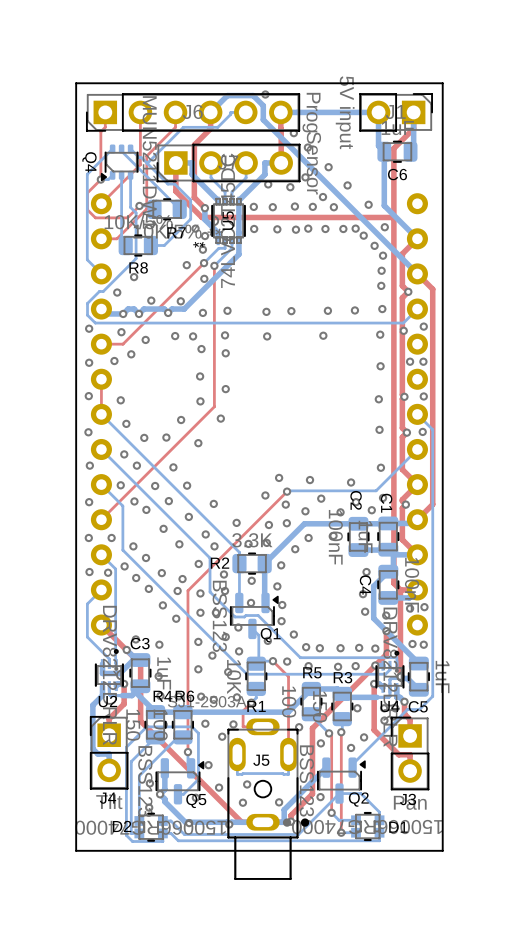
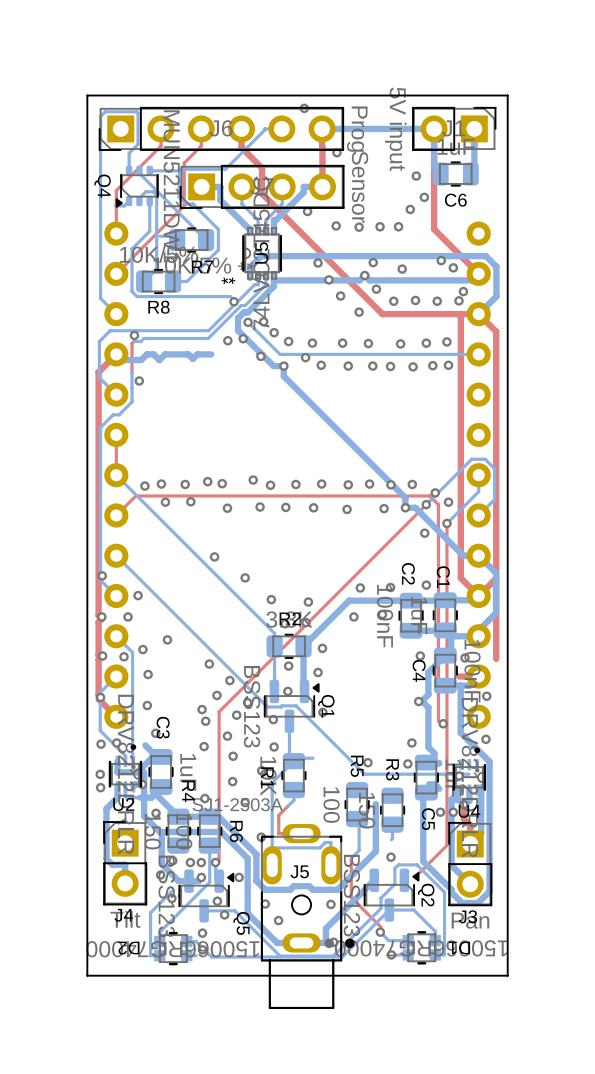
top track: (105, 112) (105, 127) (100, 131) (100, 179) (87, 192) (87, 209) (95, 217) (127, 217) (139, 205) -> none
bottom track: (210, 112) (227, 95) (253, 95) (263, 105) (263, 119) (417, 273) -> (250, 267) (261, 256) (485, 256) (496, 266) (496, 296) (478, 314)
bottom track: (230, 113) (217, 127) (183, 127) (147, 163) -> (264, 130) (225, 169) (180, 169) (179, 170)
top track: (140, 127) (140, 164) (101, 203) -> (161, 146) (116, 190) (116, 233)
top track: (210, 128) (194, 145) (194, 197) (204, 208) -> (241, 147) (262, 168) (262, 193) (382, 314) (478, 314)
top track: (413, 128) (393, 148) (393, 583) (400, 589) (400, 676) -> none
top track: (160, 142) (146, 156) (146, 208) (116, 238) (101, 238) -> (184, 163) (184, 206) (116, 273)
via: (307, 147) -> none
bottom track: (112, 149) (87, 174) (87, 260) -> (129, 170) (129, 153) (138, 144) (138, 112) (105, 111) (100, 116) (100, 298)
bottom track: (130, 149) (167, 184) (174, 184) (190, 200) (190, 219) (162, 245) -> (179, 170) (179, 197) (186, 204) (193, 204) (218, 229) (218, 250) (186, 281)
bottom track: none -> (179, 170) (149, 170)
bottom track: (384, 151) (384, 205) (417, 238) -> (273, 280) (359, 280) (364, 275) (369, 280) (472, 280) (478, 273)
via: none -> (416, 176)
top track: (175, 162) (175, 191) (201, 217) (393, 217) -> none
bottom track: (264, 167) (264, 174) (238, 200) (238, 241) -> (303, 192) (273, 220) (273, 229)
via: (328, 167) -> none
via: none -> (424, 197)
bottom track: (121, 175) (121, 241) (125, 245) -> (139, 200) (139, 198) (145, 191) (153, 191) (156, 195) (156, 268) (144, 281)
via: (305, 177) -> none
via: (100, 179) -> none
via: none -> (410, 209)
via: (347, 185) -> none
via: (290, 187) -> none
via: none -> (336, 225)
via: (322, 197) -> none
via: none -> (380, 226)
via: none -> (398, 226)
via: none -> (359, 227)
bottom track: (130, 201) (130, 207) (136, 212) (136, 258) (103, 291) (99, 291) (87, 303) (87, 315) (95, 323) (403, 323) (417, 309) -> (248, 322) (280, 354) (478, 354)
bottom track: none -> (149, 231) (132, 248) (132, 291) (137, 296) (230, 296)
via: (368, 204) -> none
via: (139, 205) -> none
via: (253, 206) -> none
via: (294, 206) -> none
via: (312, 206) -> none
via: (272, 207) -> none
via: (333, 207) -> none
bottom track: (204, 208) (204, 219) (218, 232) -> none
via: (204, 208) -> none
via: (195, 228) -> none
via: (254, 228) -> none
via: (308, 228) -> none
via: (343, 228) -> none
via: (355, 228) -> none
via: (295, 229) -> none
via: none -> (453, 267)
via: none -> (402, 269)
via: (363, 235) -> none
via: (205, 236) -> none
top track: (417, 238) (402, 253) (402, 285) (408, 291) (402, 297) (402, 394) (404, 396) (402, 398) (402, 428) (406, 432) (402, 437) (402, 469) (417, 484) (402, 499) (405, 504) (402, 508) (402, 539) (417, 554) -> (478, 273) (434, 229) (434, 128)
via: none -> (364, 275)
via: none -> (328, 279)
via: (374, 245) -> none
bottom track: (222, 248) (218, 248) (204, 263) -> (254, 284) (208, 330) (110, 330) (99, 341) (99, 377) (116, 394)
via: (202, 249) -> none
bottom track: (238, 249) (238, 254) (184, 309) -> (273, 286) (247, 312) (243, 312) (238, 318) (238, 330) (243, 335) (243, 338) (246, 338) (259, 354) (273, 366) (283, 366) (283, 376) (405, 497) (405, 507) (415, 507) (463, 555) (478, 555) (496, 573) (496, 613) (478, 630)
via: none -> (376, 289)
via: none -> (463, 291)
via: (383, 255) -> none
via: none -> (340, 296)
via: none -> (415, 300)
via: none -> (393, 301)
via: none -> (437, 301)
via: none -> (458, 300)
top track: (204, 263) (123, 344) (101, 344) -> none
via: (186, 265) -> none
top track: (214, 265) (214, 406) (101, 519) -> none
bottom track: none -> (245, 304) (241, 305) (208, 338) (143, 338) (140, 341) (134, 341)
via: (214, 265) -> none
via: (381, 270) -> none
via: none -> (359, 312)
top track: none -> (460, 314) (460, 578) (478, 596)
via: (134, 277) -> none
via: (204, 278) -> none
via: none -> (263, 321)
via: none -> (248, 322)
via: (381, 285) -> none
via: none -> (274, 332)
via: (408, 291) -> none
via: none -> (243, 338)
top track: none -> (134, 341) (132, 343) (132, 372)
via: none -> (227, 340)
via: none -> (288, 341)
via: none -> (446, 341)
via: none -> (312, 343)
via: none -> (342, 343)
via: none -> (368, 343)
via: none -> (400, 343)
via: none -> (426, 343)
via: (151, 300) -> none
via: (180, 301) -> none
via: (382, 309) -> none
via: (327, 310) -> none
via: (354, 310) -> none
via: (291, 311) -> none
via: (168, 312) -> none
via: (202, 312) -> none
via: (123, 313) -> none
via: (139, 313) -> none
via: none -> (321, 365)
via: none -> (432, 365)
via: none -> (448, 365)
via: none -> (283, 366)
via: none -> (348, 366)
via: none -> (372, 366)
via: none -> (390, 366)
via: none -> (413, 366)
bottom track: none -> (132, 372) (132, 401) (119, 414) (113, 414) (100, 427) (100, 580) (116, 596)
via: (423, 326) -> none
via: (89, 328) -> none
via: (403, 330) -> none
via: (380, 334) -> none
via: (225, 335) -> none
via: (323, 335) -> none
via: (175, 336) -> none
via: (193, 336) -> none
via: (267, 336) -> none
via: (145, 339) -> none
via: (201, 349) -> none
via: (225, 353) -> none
via: (131, 354) -> none
via: (114, 361) -> none
via: (410, 361) -> none
via: (423, 361) -> none
via: (89, 362) -> none
via: (380, 366) -> none
via: (200, 376) -> none
via: (225, 389) -> none
via: (88, 396) -> none
via: (404, 396) -> none
via: (423, 396) -> none
via: (378, 399) -> none
via: (120, 400) -> none
via: (200, 401) -> none
bottom track: (417, 414) (432, 429) (432, 696) (419, 709) (407, 709) (352, 764) (352, 767) -> (478, 475) (478, 491) (446, 523)
via: none -> (222, 483)
via: none -> (161, 484)
via: none -> (185, 484)
via: none -> (295, 484)
via: none -> (321, 484)
via: none -> (348, 484)
via: none -> (369, 484)
via: none -> (390, 484)
via: none -> (412, 484)
via: none -> (270, 485)
via: (422, 431) -> none
via: (88, 432) -> none
via: (406, 432) -> none
via: none -> (448, 502)
top track: none -> (426, 504) (219, 711) (219, 861)
via: none -> (426, 504)
via: none -> (260, 507)
via: none -> (285, 507)
via: none -> (313, 507)
via: none -> (405, 507)
via: none -> (384, 508)
via: none -> (347, 509)
top track: none -> (116, 515) (135, 495) (429, 495) (438, 504) (438, 721)
bottom track: (101, 449) (210, 558) (210, 592) (234, 616) (244, 616) -> (140, 580) (267, 706) (280, 706)
bottom track: (417, 449) (376, 490) (287, 491) -> (478, 515) (494, 499) (494, 468) (485, 459) (471, 459) (426, 504)
via: (124, 454) -> none
top track: none -> (446, 523) (446, 845) (416, 876)
via: none -> (446, 523)
via: none -> (424, 533)
via: (89, 465) -> none
via: (136, 465) -> none
via: (173, 467) -> none
via: (380, 467) -> none
via: (279, 477) -> none
via: (310, 480) -> none
via: (351, 482) -> none
via: (120, 485) -> none
via: (155, 486) -> none
top track: (287, 491) (187, 590) (187, 752) -> none
via: (287, 491) -> none
via: (265, 495) -> none
via: (383, 497) -> none
via: (321, 498) -> none
via: (134, 501) -> none
via: (168, 501) -> none
via: (356, 502) -> none
via: (285, 504) -> none
via: (405, 504) -> none
bottom track: (122, 506) (122, 550) (246, 674) (385, 674) (389, 669) (389, 665) -> none
via: (146, 509) -> none
via: (305, 511) -> none
via: none -> (360, 587)
via: (188, 516) -> none
via: none -> (138, 595)
via: (286, 523) -> none
via: (163, 528) -> none
via: (205, 534) -> none
via: (179, 544) -> none
via: (133, 546) -> none
via: (214, 546) -> none
via: (295, 549) -> none
via: (198, 563) -> none
R2 name position: R2 (220, 563) -> R2 (290, 618)
via: (161, 573) -> none
via: none -> (465, 658)
via: (223, 574) -> none
via: (136, 578) -> none
bottom track: (373, 586) (373, 618) (418, 663) -> (428, 672) (428, 694) (421, 701) (428, 707) (428, 747) (435, 753)
via: none -> (148, 674)
via: (148, 588) -> none
via: (177, 590) -> none
via: (225, 590) -> none
via: (363, 594) -> none
bottom track: none -> (460, 685) (460, 732) (489, 761) (489, 891) (478, 902) (462, 902) (423, 861) (423, 795) (426, 792)
via: (162, 605) -> none
via: (282, 605) -> none
via: none -> (216, 695)
via: none -> (100, 697)
via: (410, 608) -> none
via: (200, 612) -> none
via: none -> (147, 705)
via: (386, 615) -> none
via: none -> (236, 715)
top track: (101, 625) (140, 664) (140, 721) (241, 822) (291, 821) (291, 815) (312, 793) (312, 728) (386, 654) (386, 631) -> (116, 716) (98, 699) (100, 697) (98, 695) (98, 659) (100, 657) (98, 655) (98, 622) (101, 618) (98, 615) (98, 372) (116, 354)
via: none -> (205, 721)
bottom track: (252, 628) (258, 635) (258, 661) (256, 663) -> (289, 721) (289, 756) (293, 761) (272, 782) (272, 865)
via: (293, 634) -> none
Q1 name rotation: 0° (270, 635) -> 90° clockwise (326, 706)
via: (225, 636) -> none
via: (267, 640) -> none
C3 name rotation: 0° (140, 643) -> 90° clockwise (163, 727)
via: (159, 644) -> none
via: (412, 644) -> none
via: none -> (116, 742)
via: (306, 647) -> none
via: none -> (101, 744)
via: (319, 648) -> none
via: (340, 648) -> none
via: (375, 648) -> none
via: (126, 649) -> none
via: none -> (204, 746)
via: (212, 655) -> none
bottom track: (300, 657) (396, 657) (396, 665) -> (344, 754) (364, 774) (469, 774)
via: none -> (233, 756)
top track: (272, 661) (288, 676) (288, 754) -> none
via: (272, 661) -> none
via: (287, 661) -> none
via: none -> (367, 762)
via: (375, 665) -> none
via: (308, 666) -> none
via: (338, 666) -> none
via: (198, 669) -> none
U4 position: (389, 671) -> (469, 771)
R5 name rotation: 0° (312, 672) -> 90° clockwise (357, 766)
via: none -> (100, 774)
via: (158, 676) -> none
C5 position: (418, 676) -> (426, 777)
R3 name rotation: 0° (342, 677) -> 90° clockwise (392, 769)
via: none -> (232, 781)
top track: (124, 683) (124, 703) (109, 718) (109, 735) -> none
top track: (374, 683) (374, 730) (398, 754) (410, 754) (410, 771) -> none
via: (374, 683) -> none
via: none -> (100, 787)
bottom track: none -> (481, 787) (481, 833) (470, 843)
bottom track: none -> (460, 790) (451, 799) (451, 865) (470, 884)
bottom track: none -> (469, 790) (469, 800) (465, 803)
bottom track: (418, 689) (407, 678) (391, 678) (388, 697) (345, 697) (337, 688) (311, 688) (288, 712) (190, 712) -> (375, 804) (375, 851) (337, 889) (312, 889) (309, 886) (293, 886) (290, 889) (265, 889) (256, 880) (256, 854) (218, 816)
via: (160, 695) -> none
R4 name rotation: 0° (162, 696) -> 90° clockwise (188, 791)
R6 name rotation: 0° (184, 696) -> 90° clockwise (236, 831)
R6 name position: R6 (184, 696) -> R6 (236, 831)
via: (201, 696) -> none
via: (236, 697) -> none
via: (251, 702) -> none
R1 name rotation: 0° (256, 706) -> 90° clockwise (267, 777)
R1 name position: R1 (256, 706) -> R1 (267, 777)
C5 name rotation: 0° (418, 706) -> 90° clockwise (428, 819)
via: (357, 708) -> none
via: none -> (156, 813)
bottom track: (311, 714) (329, 733) -> none
bottom track: none -> (359, 824) (359, 850) (351, 858)
via: (384, 720) -> none
via: (205, 723) -> none
via: (233, 724) -> none
bottom track: none -> (161, 832) (161, 864) (178, 881) (198, 881) (201, 877)
via: (299, 727) -> none
via: none -> (261, 837)
top track: (341, 732) (341, 832) -> none
via: (341, 732) -> none
top track: (329, 733) (331, 735) (331, 812) -> none
via: (329, 733) -> none
via: (222, 736) -> none
bottom track: (182, 737) (177, 737) (139, 775) (139, 812) -> (209, 845) (209, 882) (159, 932)
via: (364, 737) -> none
bottom track: (150, 742) (131, 761) (131, 795) -> (172, 890) (150, 912)
via: (320, 743) -> none
via: none -> (390, 857)
via: (351, 747) -> none
top track: none -> (351, 858) (351, 897) (381, 927)
via: none -> (172, 860)
via: none -> (190, 862)
via: none -> (201, 862)
bottom track: (288, 754) (288, 774) (283, 774) (237, 774) (237, 754) -> (330, 865) (330, 842) (325, 842) (320, 847) (272, 847)
via: none -> (160, 875)
via: none -> (201, 877)
bottom track: (164, 768) (164, 789) (160, 794) (185, 822) (227, 822) (229, 824) (231, 822) (241, 822) -> (144, 772) (144, 816) (159, 832) (221, 832) (247, 858) (247, 913) (277, 942)
via: (247, 784) -> none
via: none -> (217, 901)
via: (219, 787) -> none
via: none -> (265, 904)
via: none -> (330, 904)
via: (160, 794) -> none
bottom track: (183, 794) (198, 779) (198, 733) (192, 726) (146, 726) (126, 747) (126, 835) (132, 841) (162, 841) (162, 833) -> none
via: (320, 797) -> none
Q2 name rotation: 0° (358, 799) -> 90° clockwise (426, 895)
Q5 name rotation: 0° (196, 800) -> 90° clockwise (241, 923)
via: (279, 802) -> none
via: (149, 807) -> none
via: none -> (202, 933)
via: (189, 823) -> none
via: (229, 824) -> none
D2 name rotation: 0° (122, 826) -> 180° (128, 948)
D1 name rotation: 0° (398, 827) -> 180° (459, 947)
via: none -> (202, 949)
bottom track: (379, 832) (379, 840) (178, 840) (170, 833) -> (435, 954) (444, 954) (444, 892) (417, 864) (398, 864) (394, 868) (394, 884) (380, 898) (380, 908) (333, 956) (280, 956) (234, 910) (210, 910)

